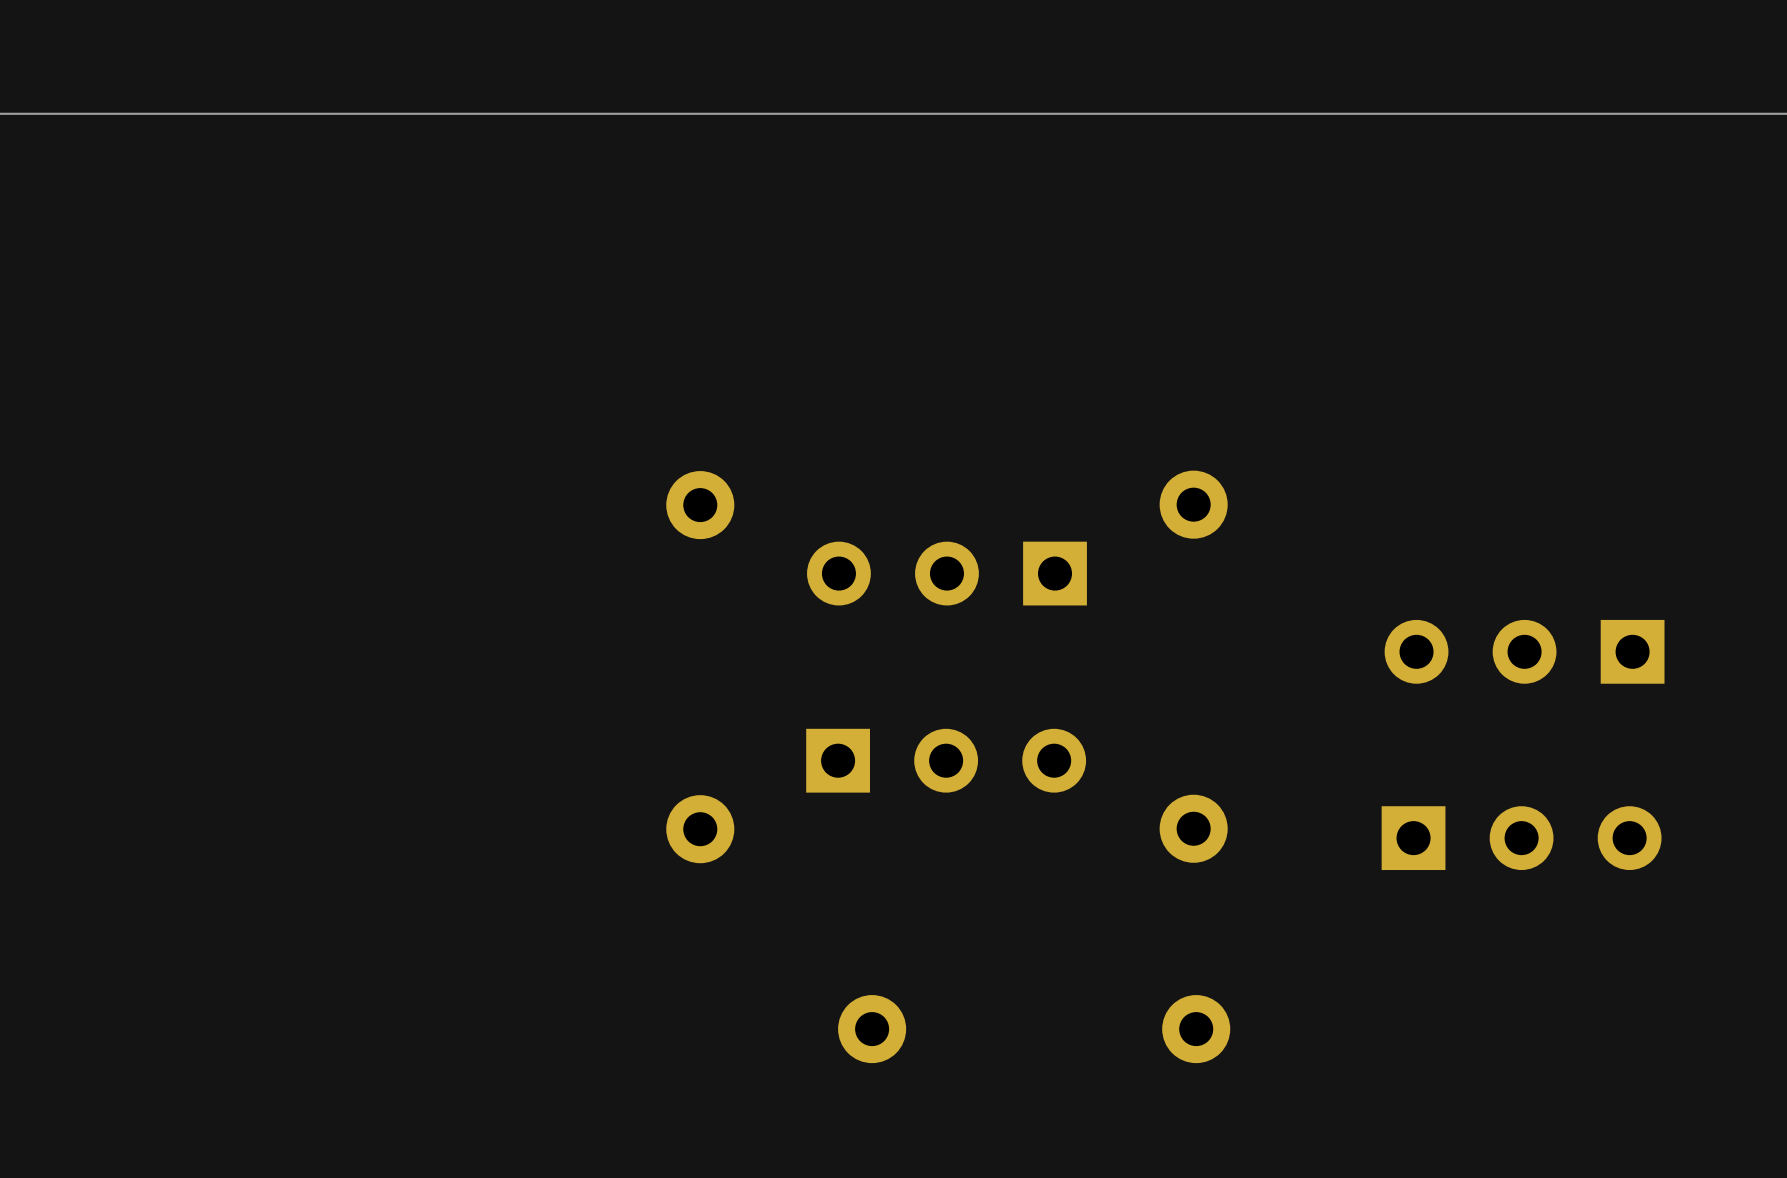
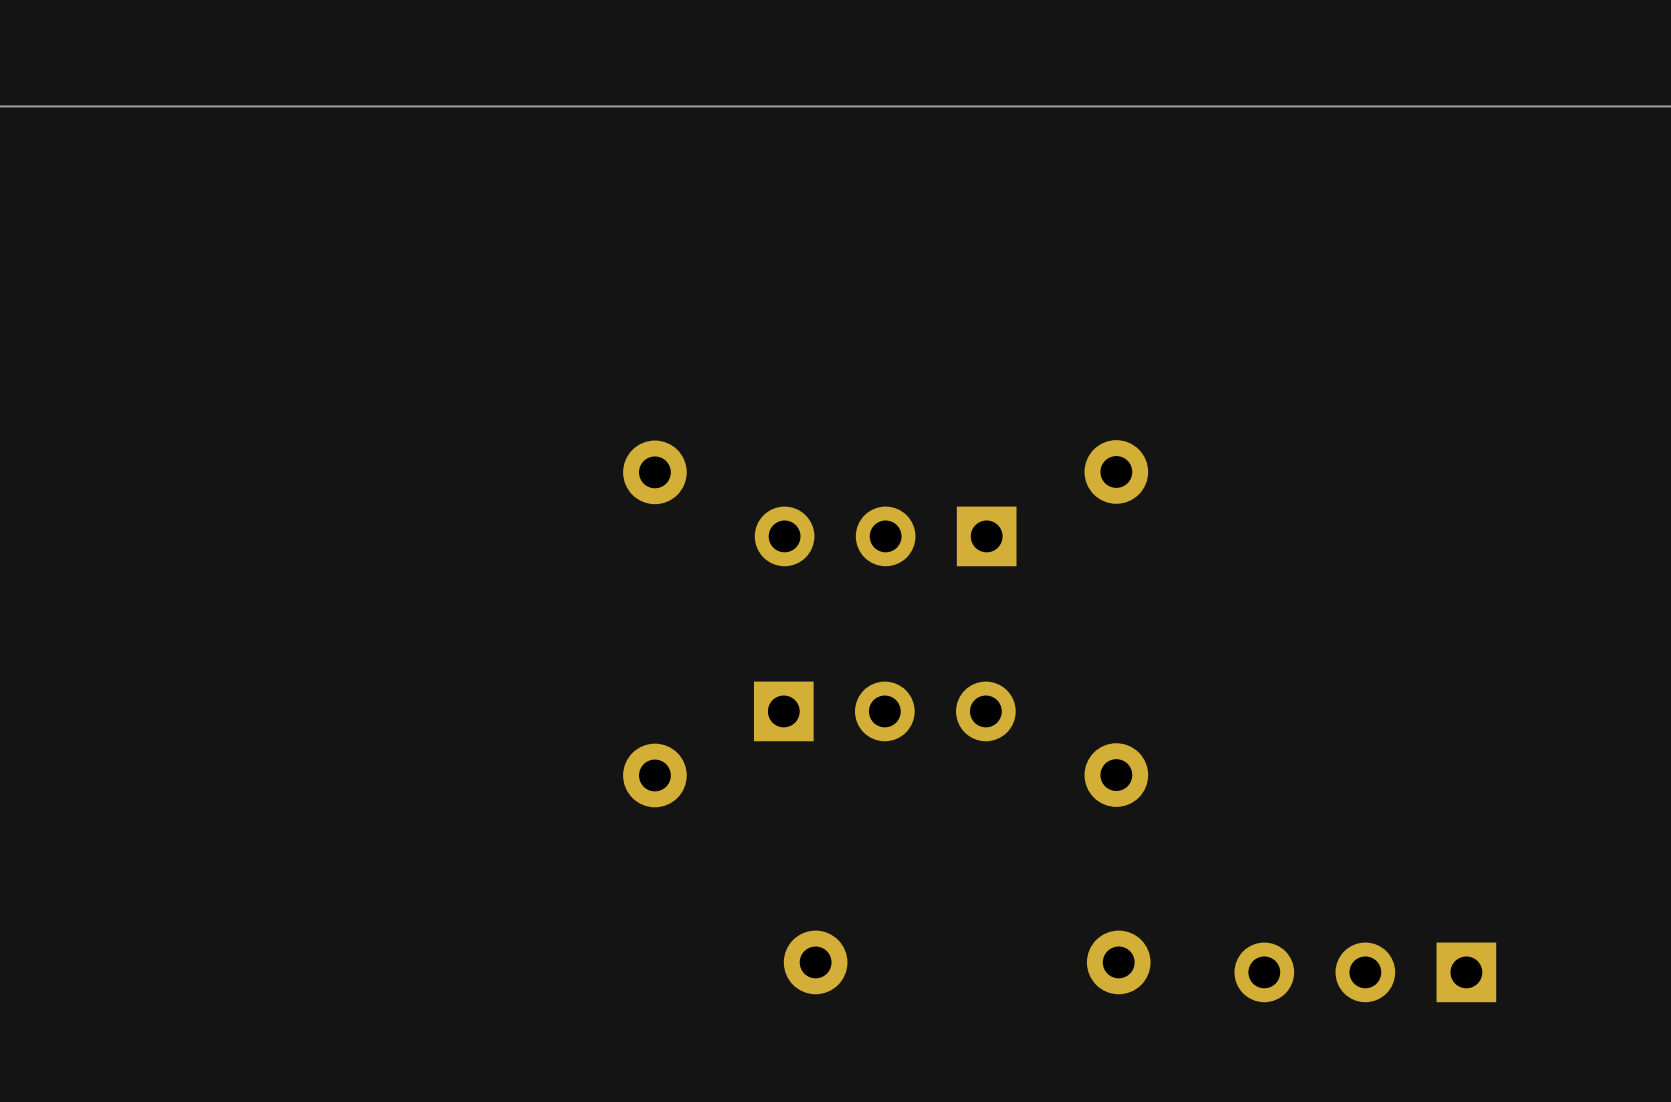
part: (1524, 651) -> none
part: (1521, 838) -> none
part: none -> (1365, 972)

